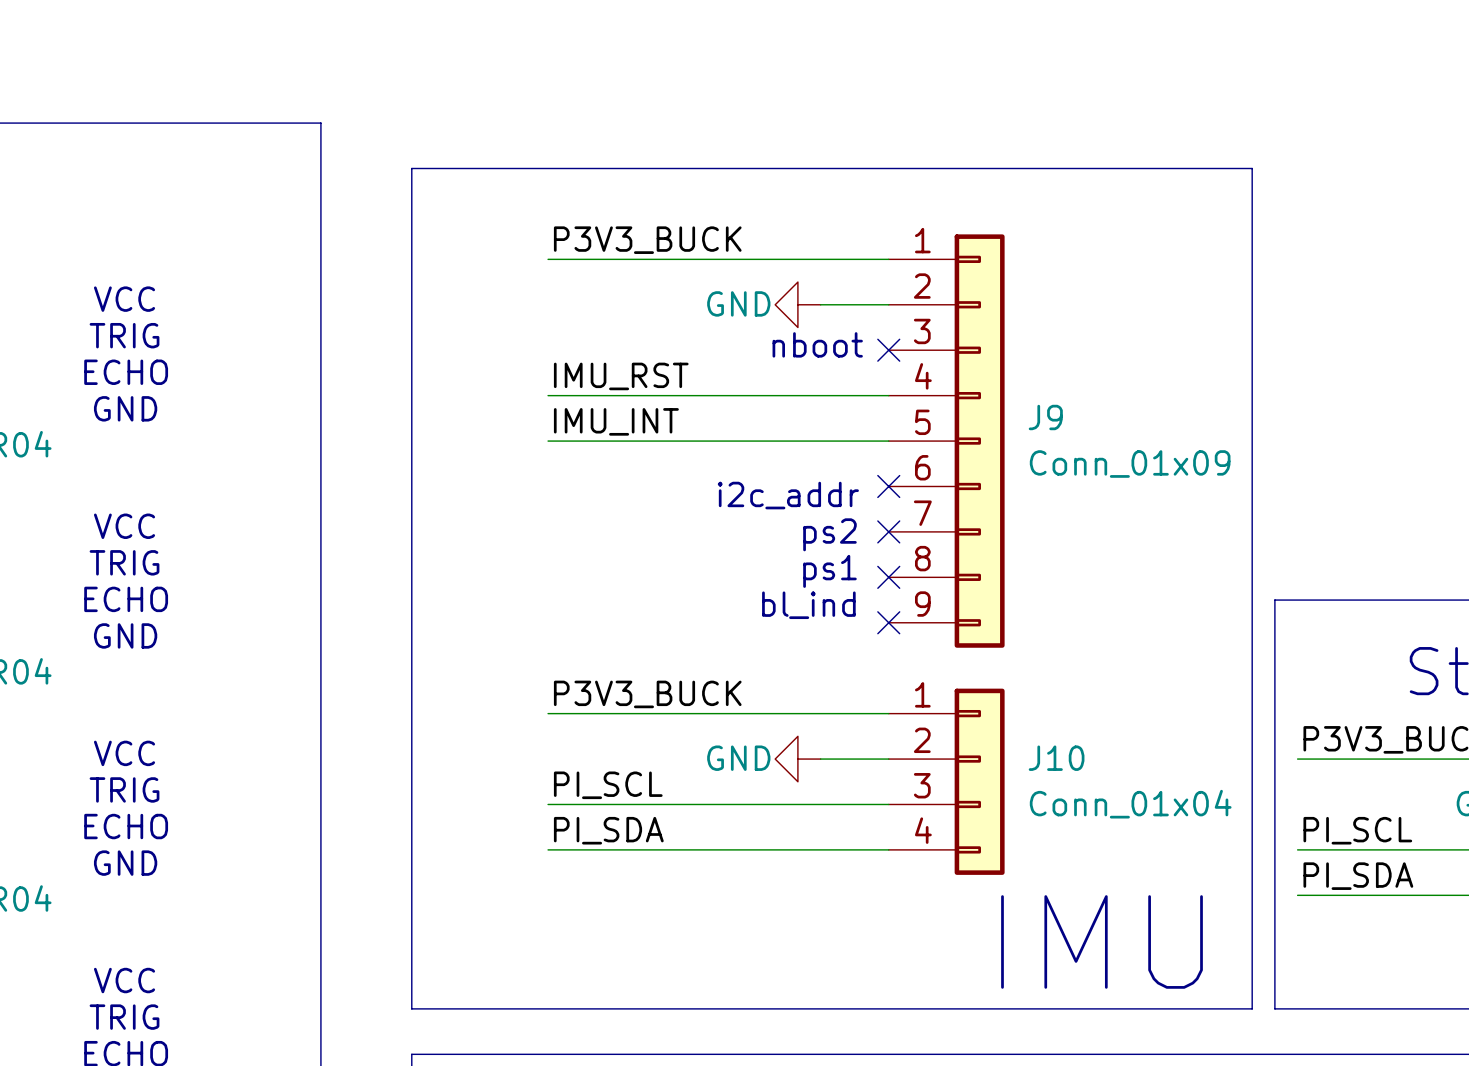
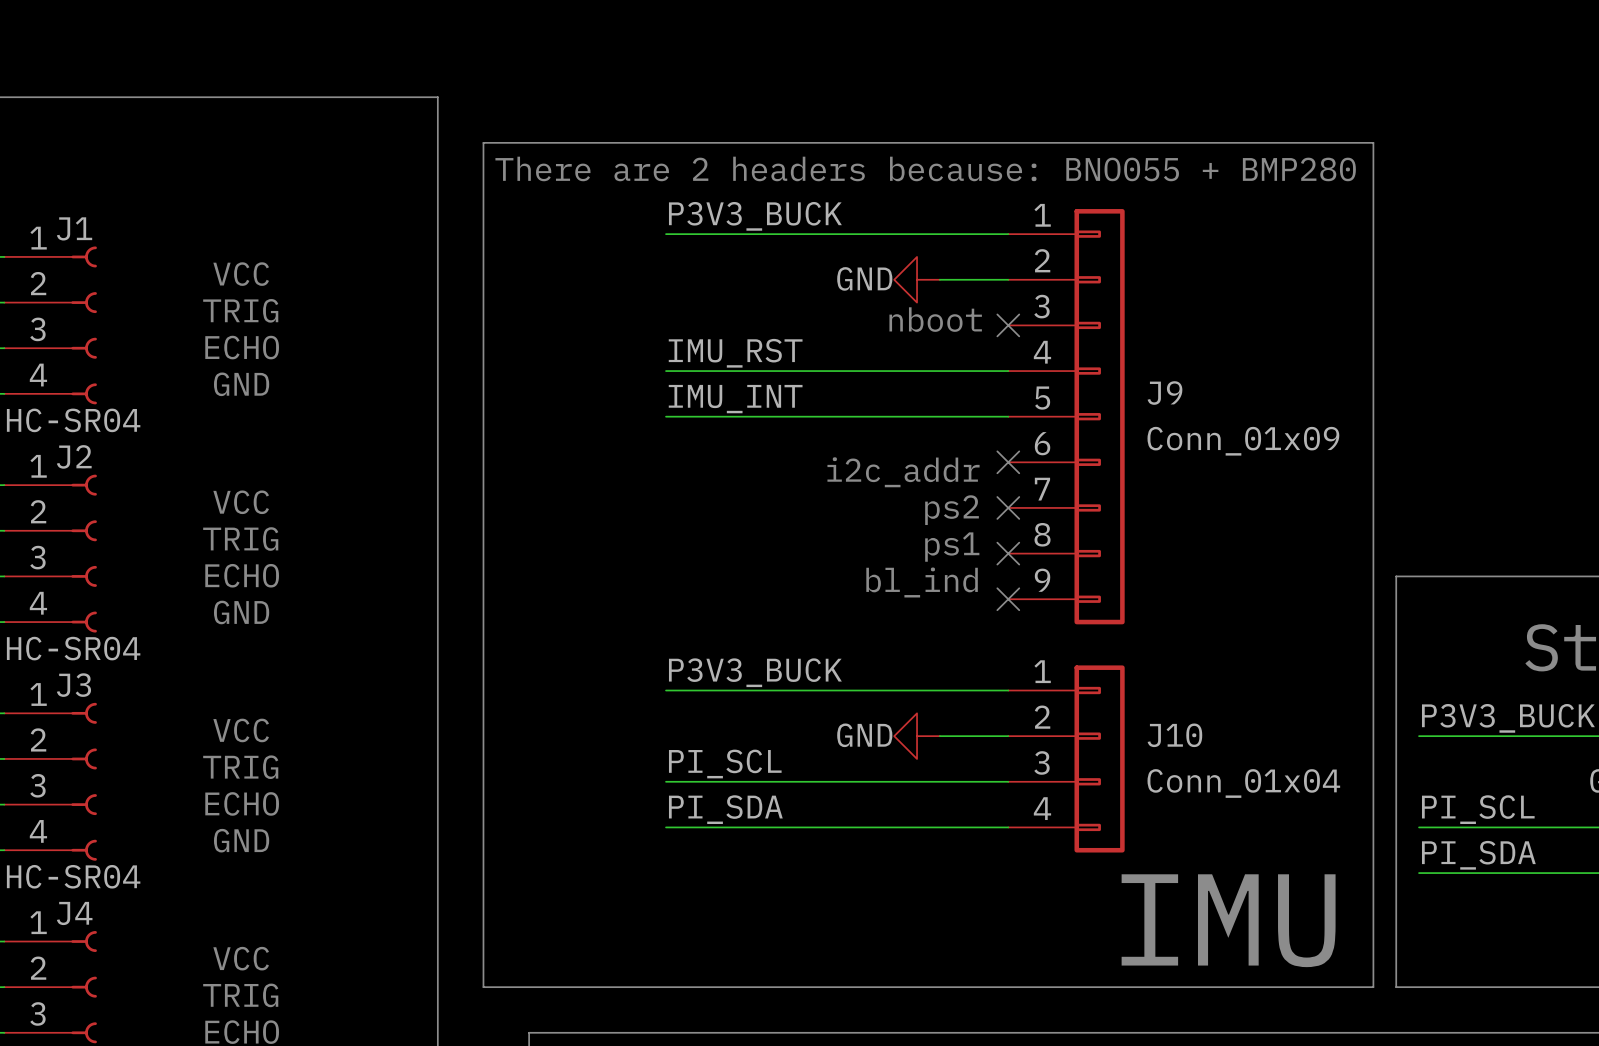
line: (411, 168) (411, 1008) -> (529, 142) (483, 142) (483, 987) (529, 987)
text: none -> There are 2 headers because: BNO055 + BMP280 (925, 168)

